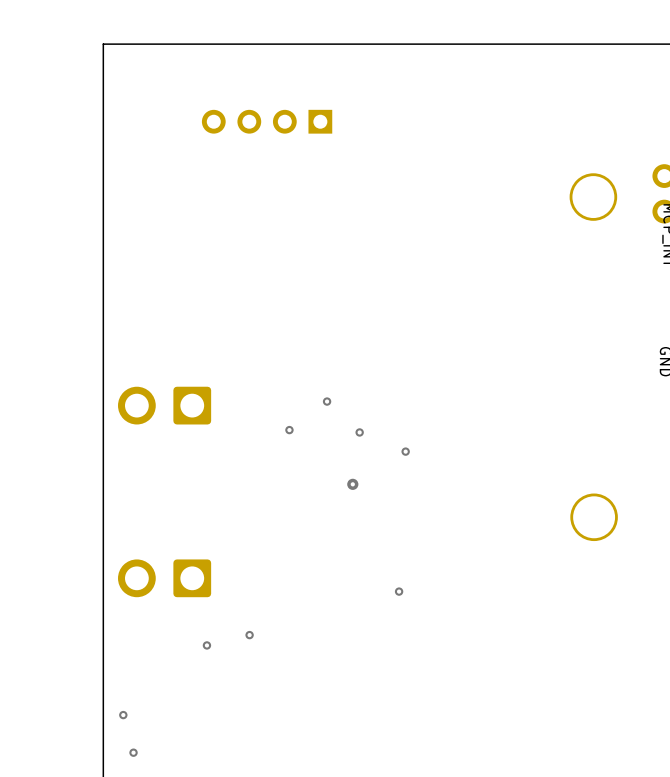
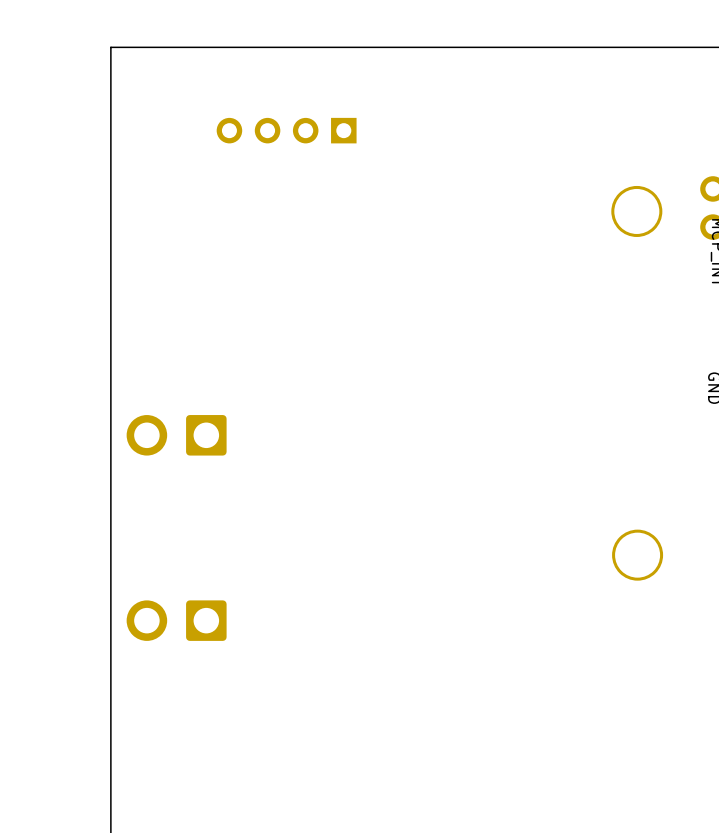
via: (327, 401) -> none
via: (289, 430) -> none
via: (359, 432) -> none
via: (405, 451) -> none
via: (352, 484) -> none
via: (399, 591) -> none
via: (249, 635) -> none
via: (206, 645) -> none
via: (123, 715) -> none
via: (133, 752) -> none

